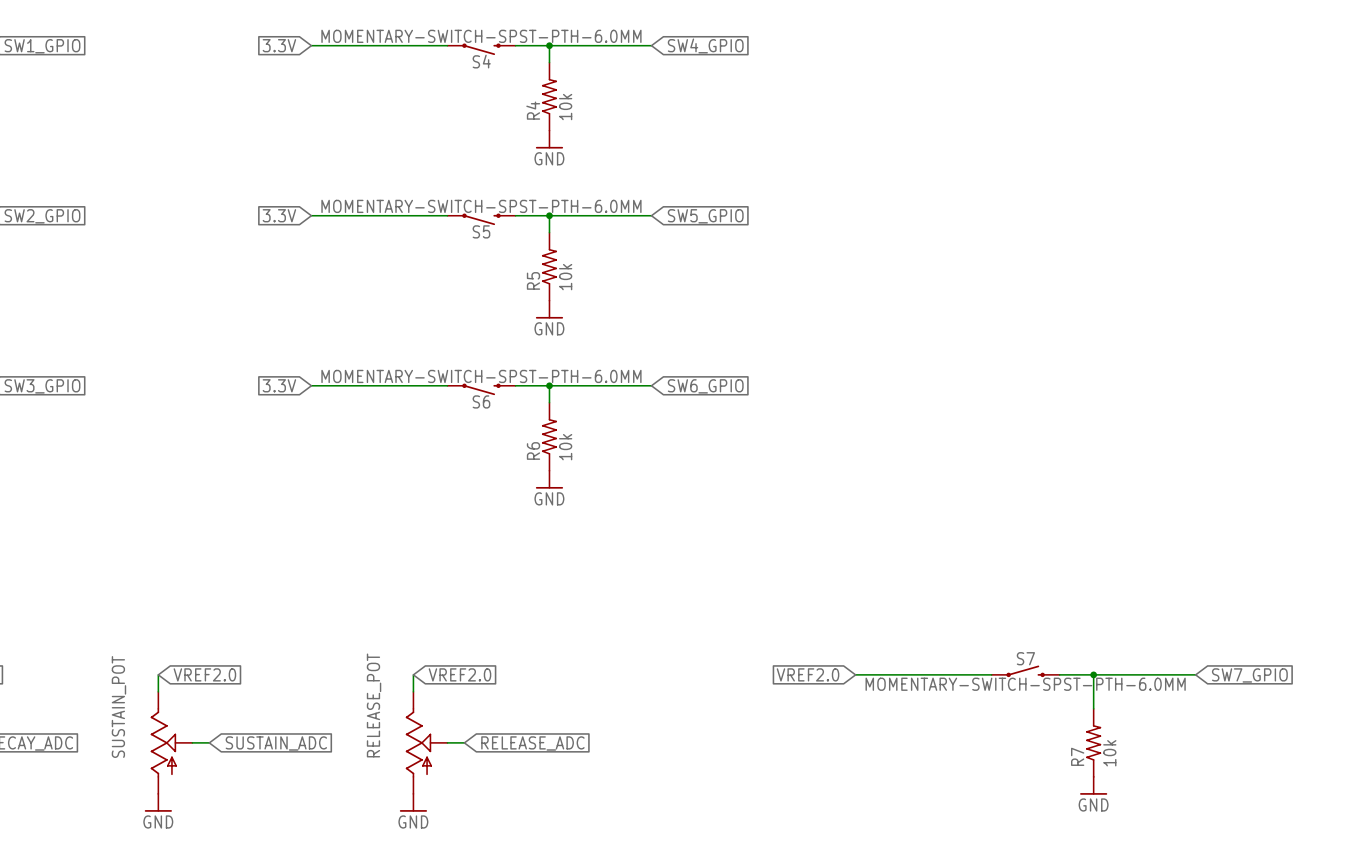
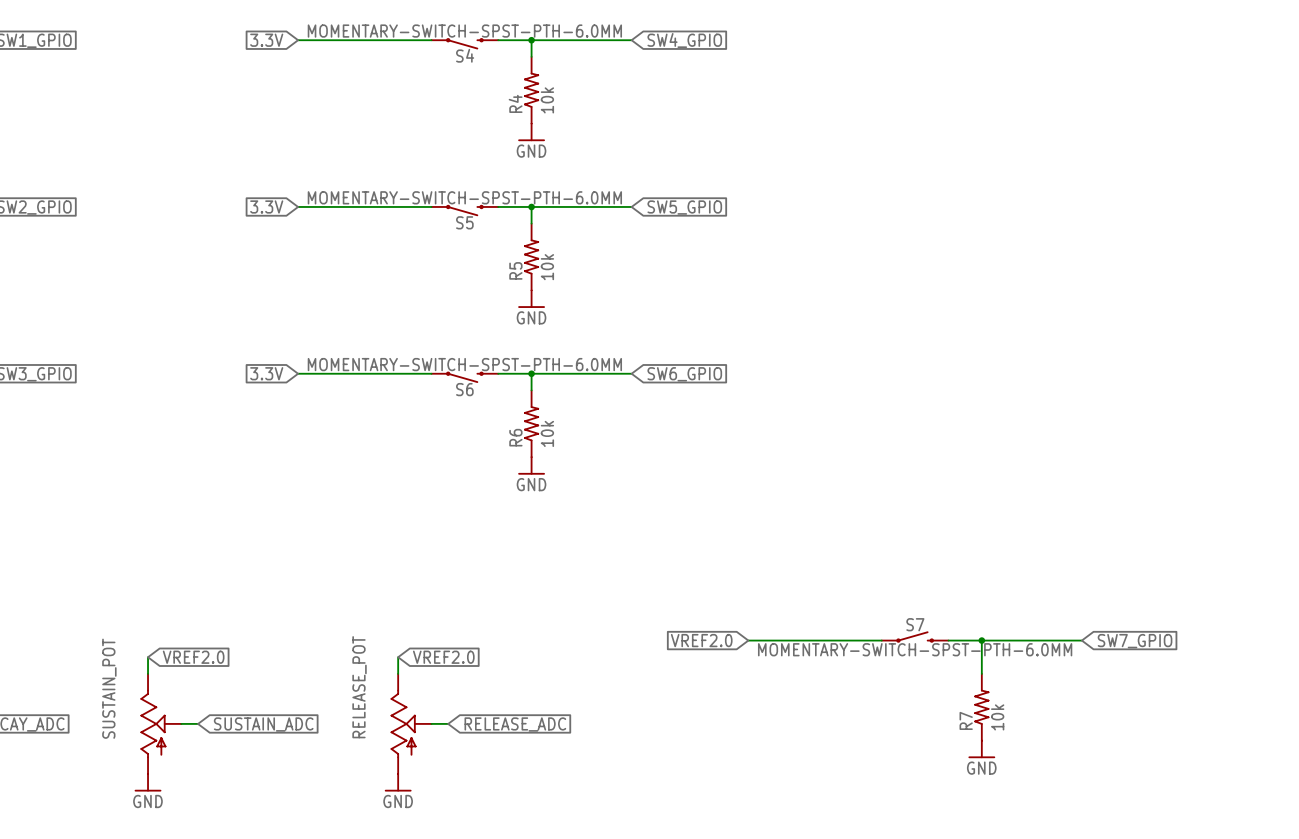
junction: none -> (981, 640)
S7 position: (1025, 671) -> (915, 637)
global label position: VREF2.0 (808, 674) -> VREF2.0 (701, 640)
wire: (855, 674) (991, 674) -> (748, 640) (881, 640)
wire: (1059, 674) (1195, 674) -> (948, 640) (1081, 640)
wire: (1093, 674) (1093, 708) -> (981, 640) (981, 673)
junction: (1093, 674) -> none
global label position: SW7_GPIO (1249, 675) -> SW7_GPIO (1135, 641)
R7 position: (1093, 742) -> (981, 707)
power symbol position: GND (1093, 785) -> GND (981, 749)

